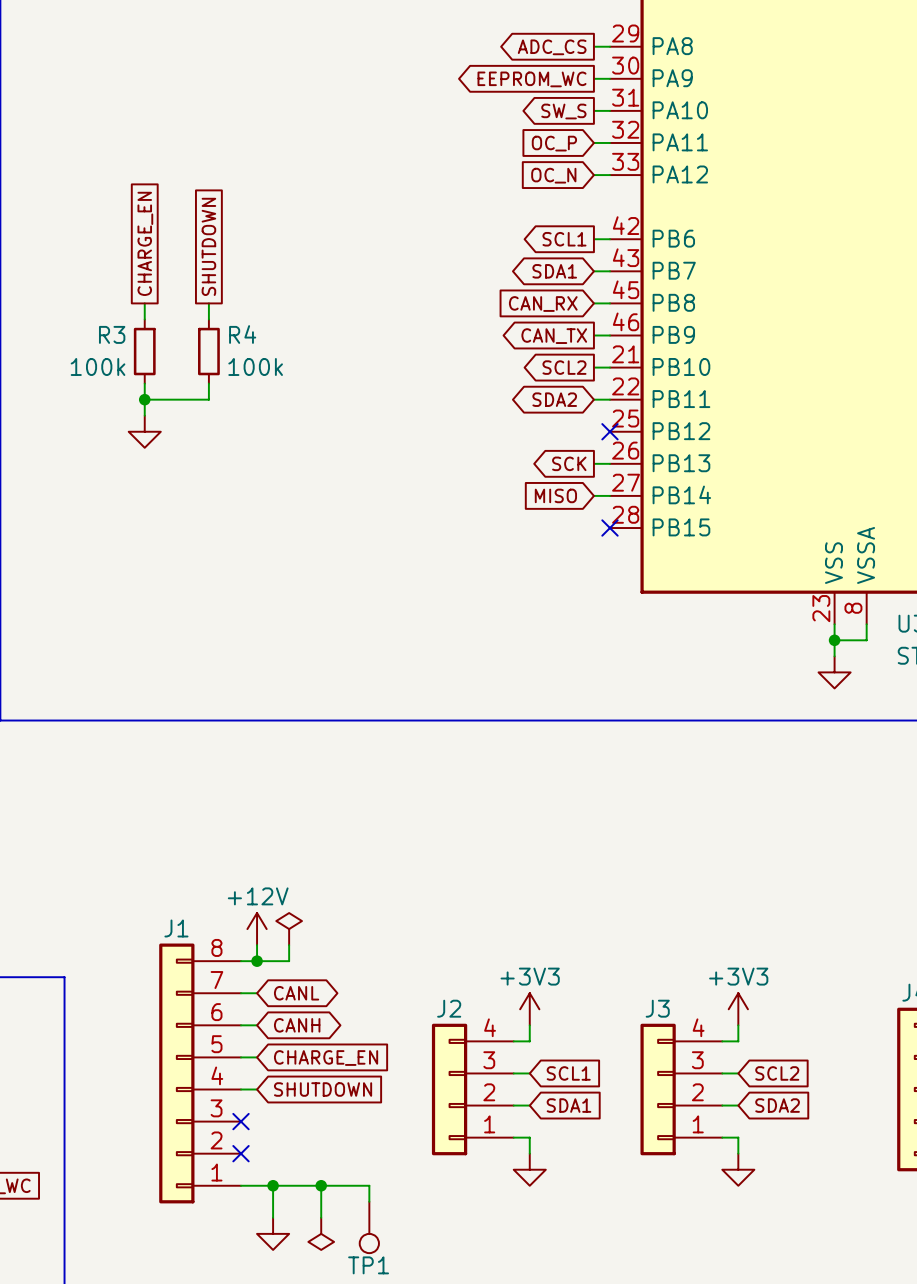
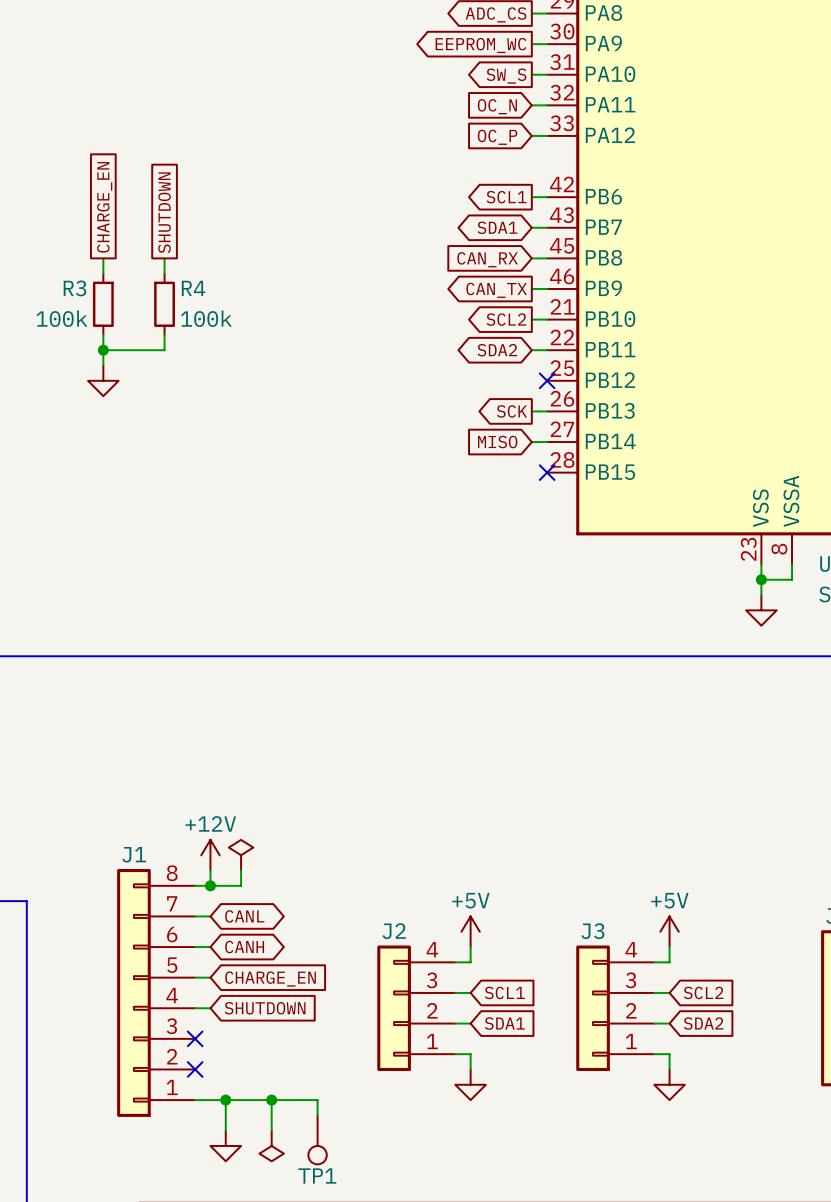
global label: OC_P (554, 143) -> OC_N (497, 106)
global label: OC_N (553, 175) -> OC_P (497, 137)
power symbol: +3V3 (529, 1009) -> +5V (470, 931)
power symbol: +3V3 (738, 1009) -> +5V (669, 931)

